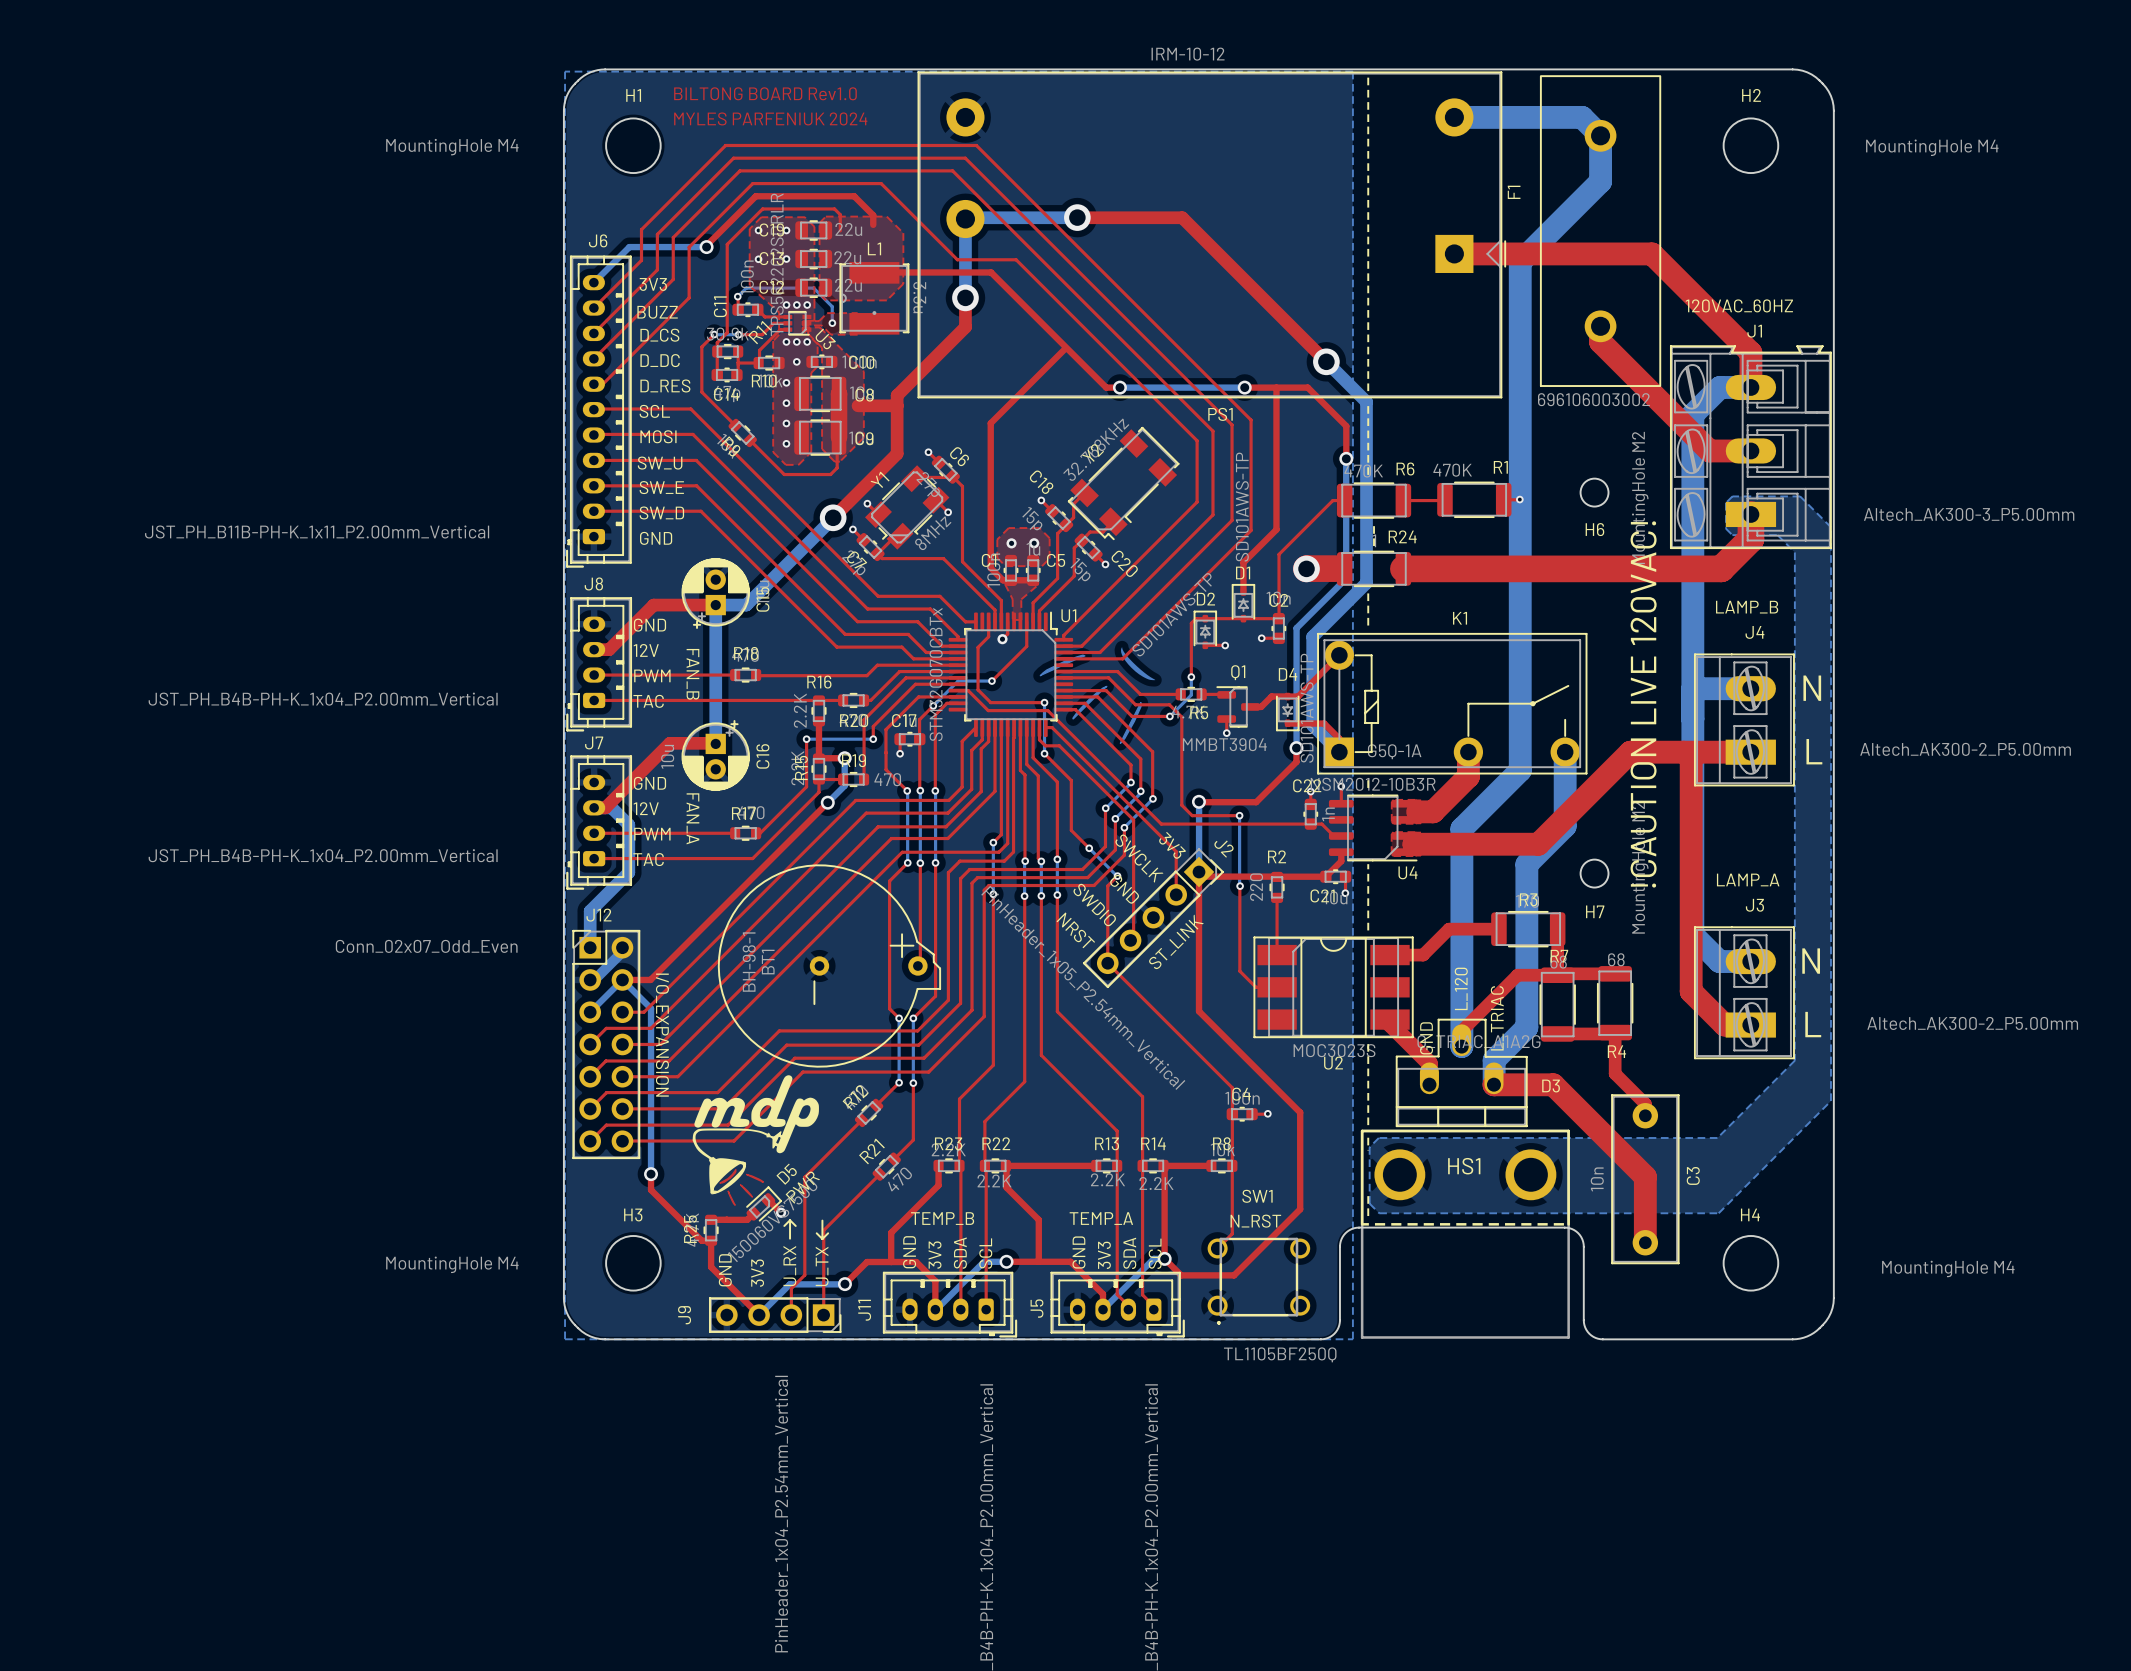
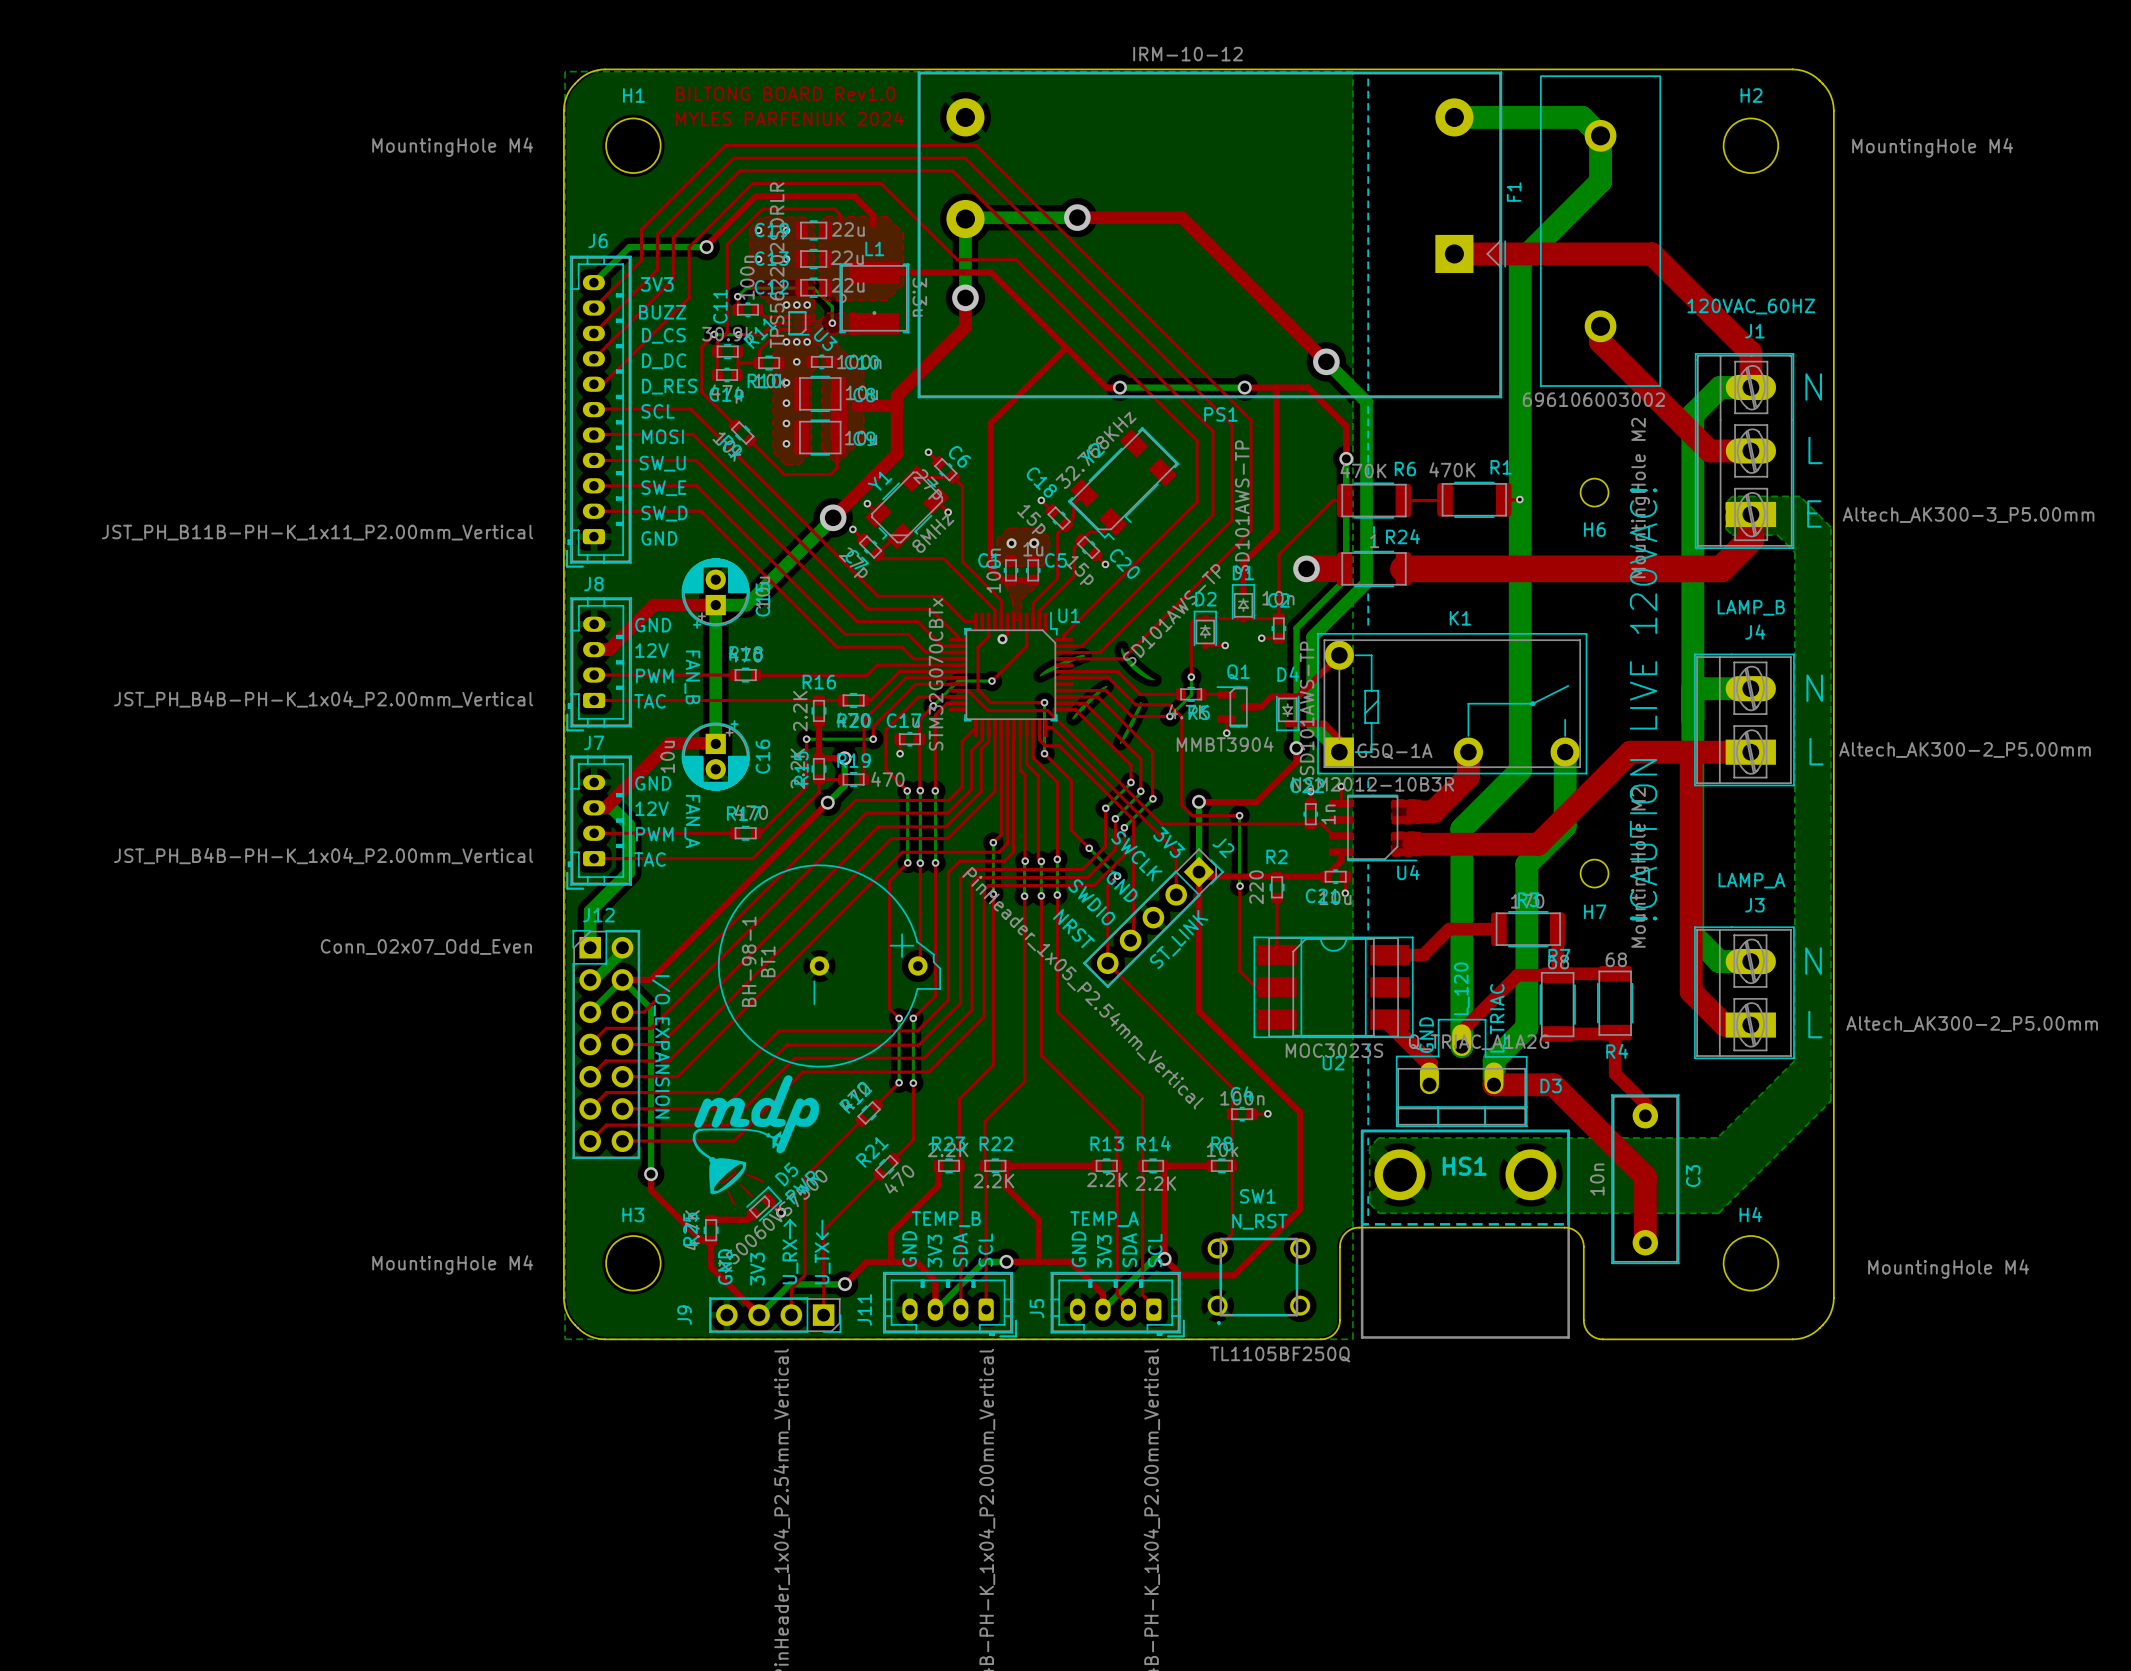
J1 footprint: [1670, 345, 1832, 549] -> [1694, 353, 1795, 549]
text: none -> N (1813, 386)
text: none -> L (1815, 450)
text: none -> E (1814, 513)

